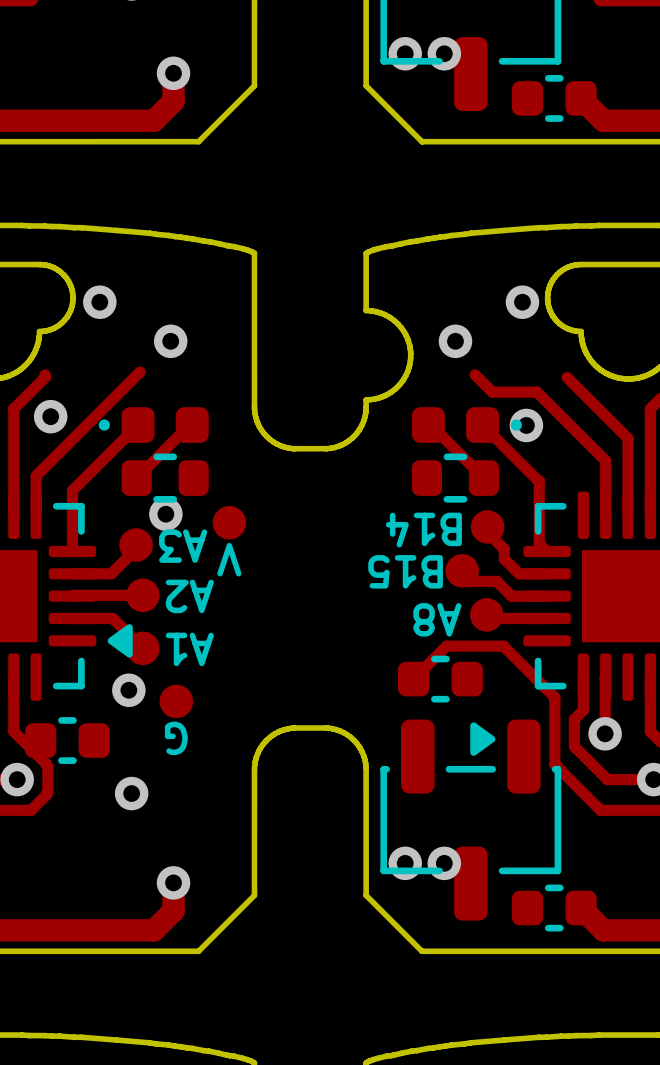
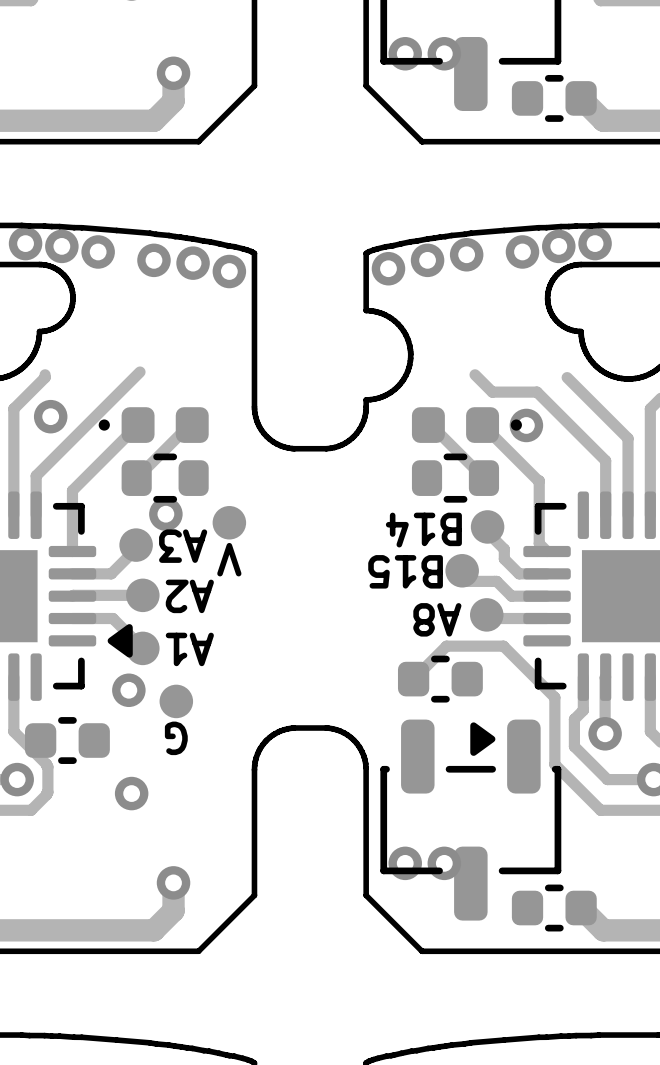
via: none -> (25, 243)
via: none -> (595, 243)
via: none -> (61, 246)
via: none -> (558, 246)
via: none -> (98, 251)
via: none -> (522, 251)
via: none -> (466, 254)
via: none -> (153, 260)
via: none -> (427, 260)
via: none -> (193, 263)
via: none -> (388, 268)
via: none -> (229, 271)
via: (99, 302) -> none
via: (522, 302) -> none
via: (170, 341) -> none
via: (455, 341) -> none

